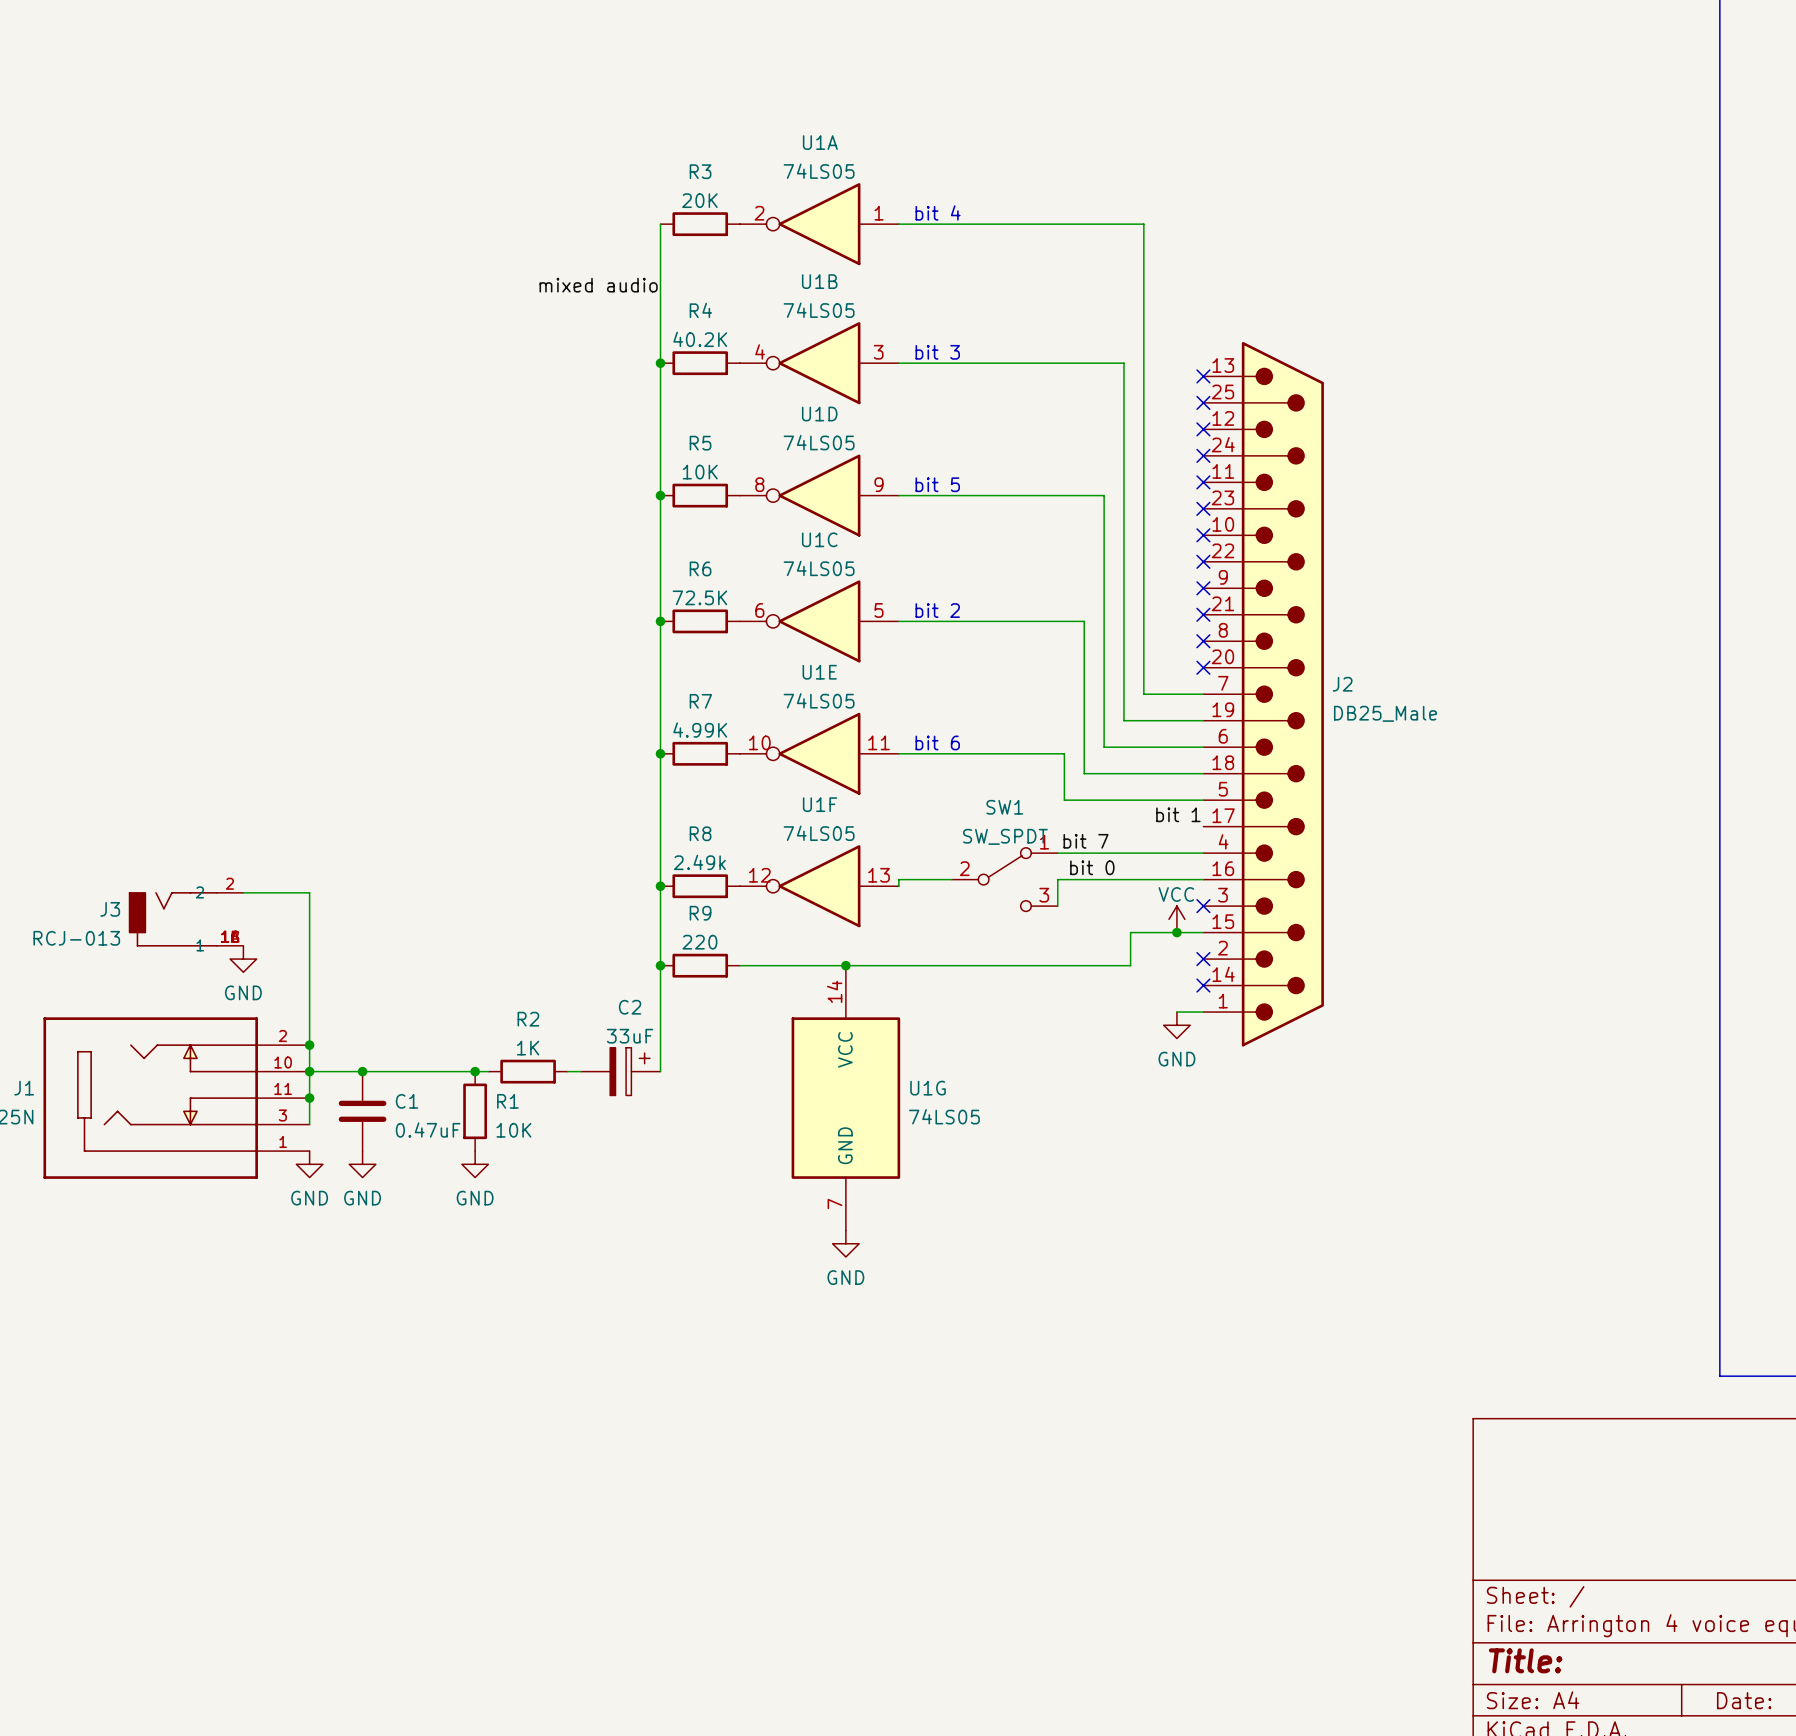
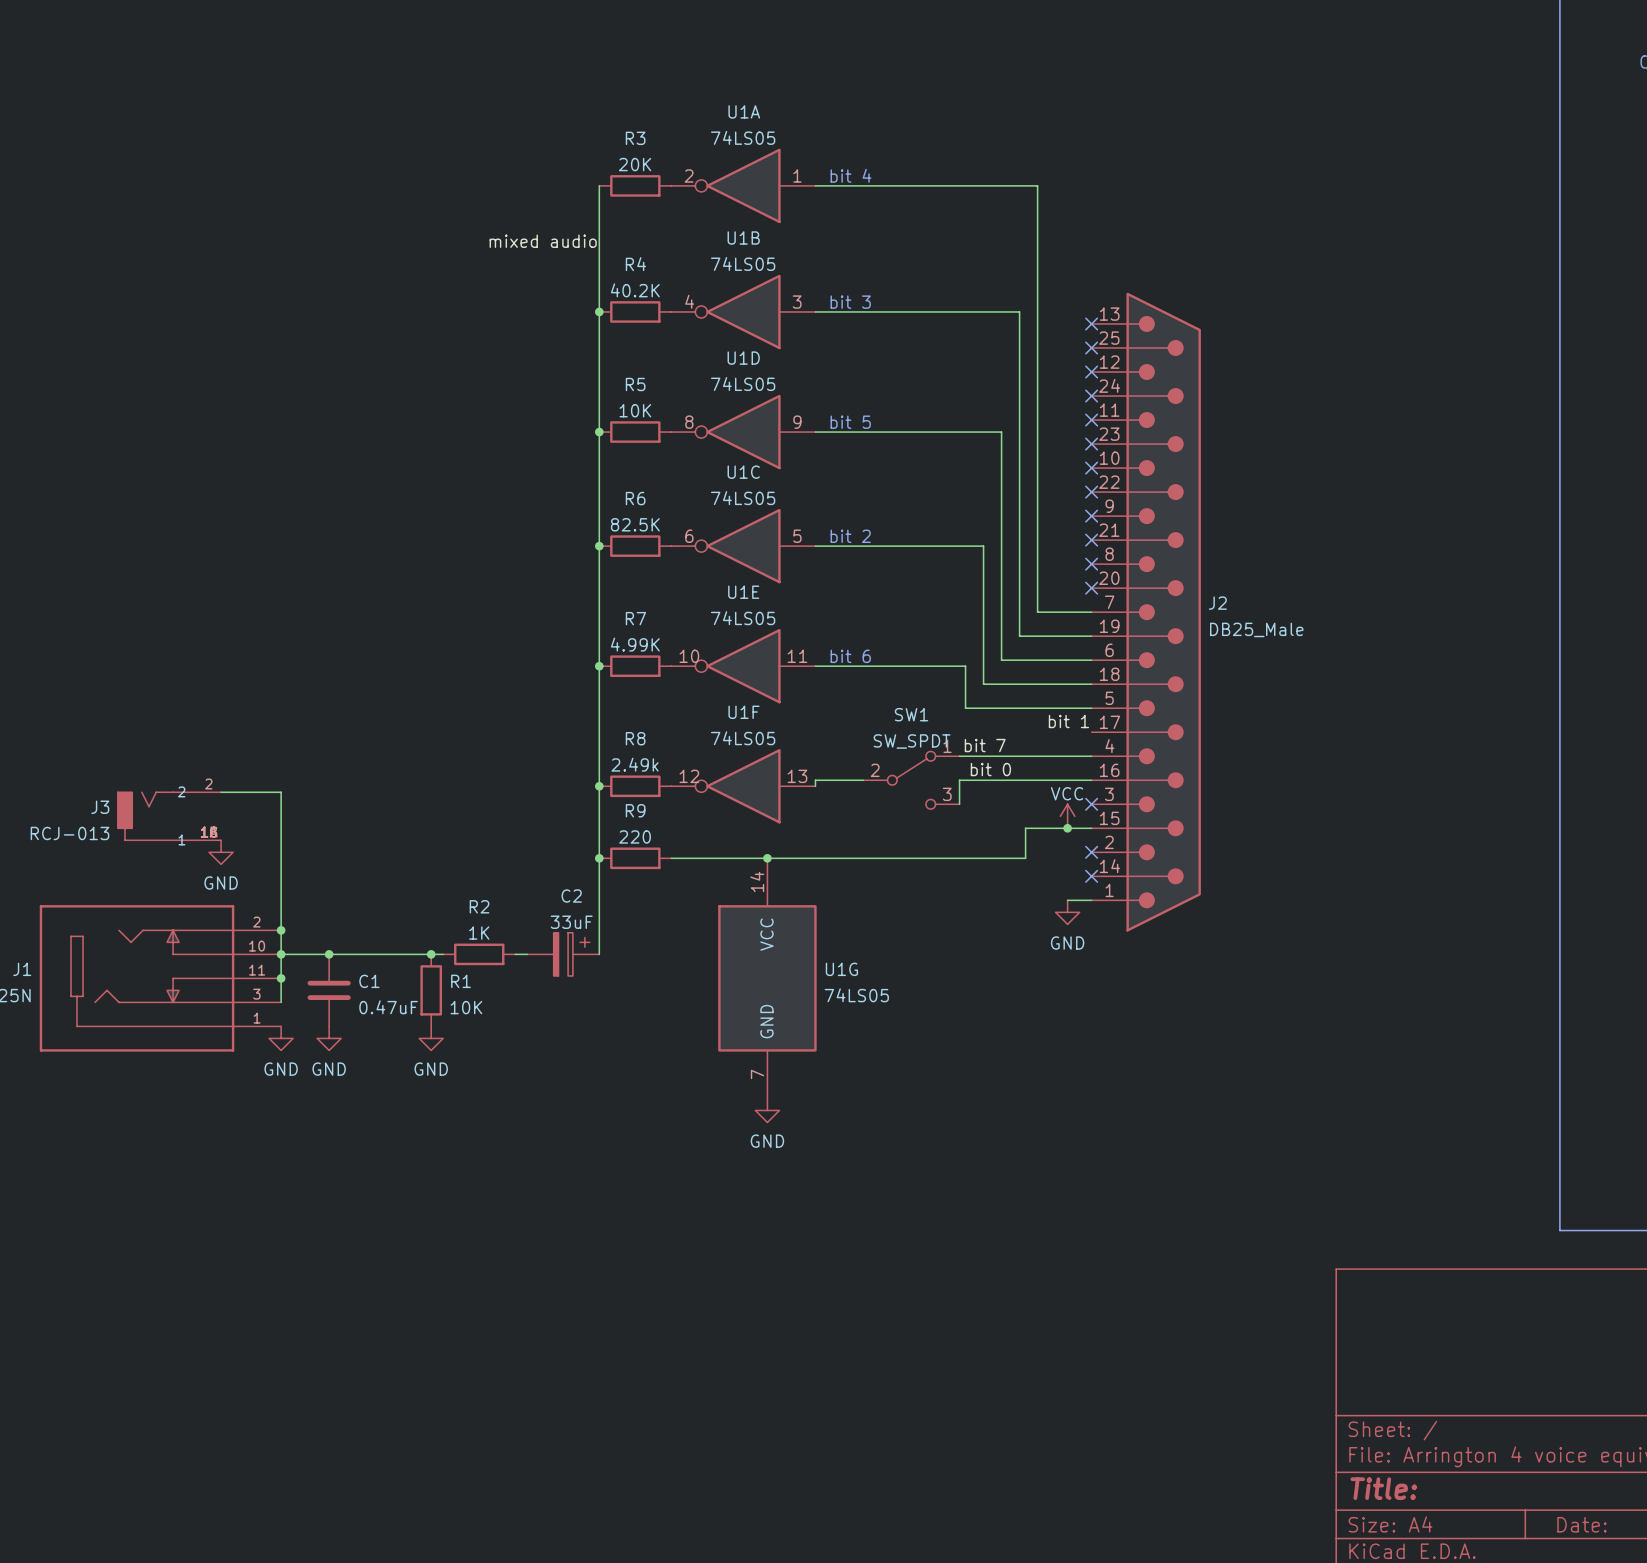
R6 value: 72.5K (699, 597) -> 82.5K (635, 524)

